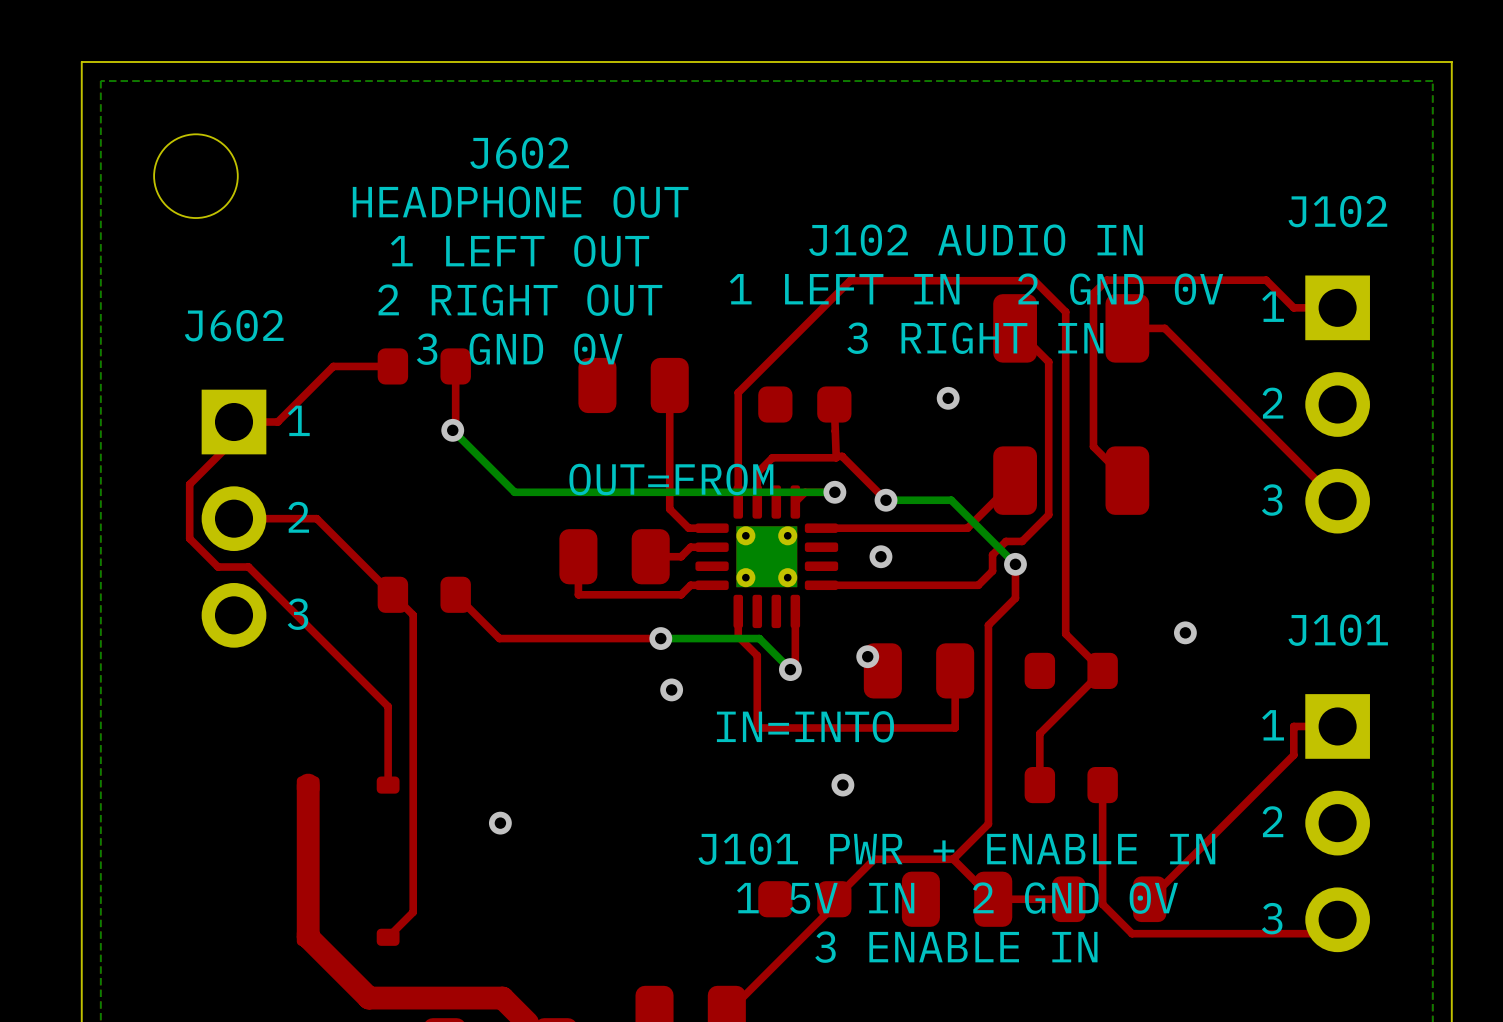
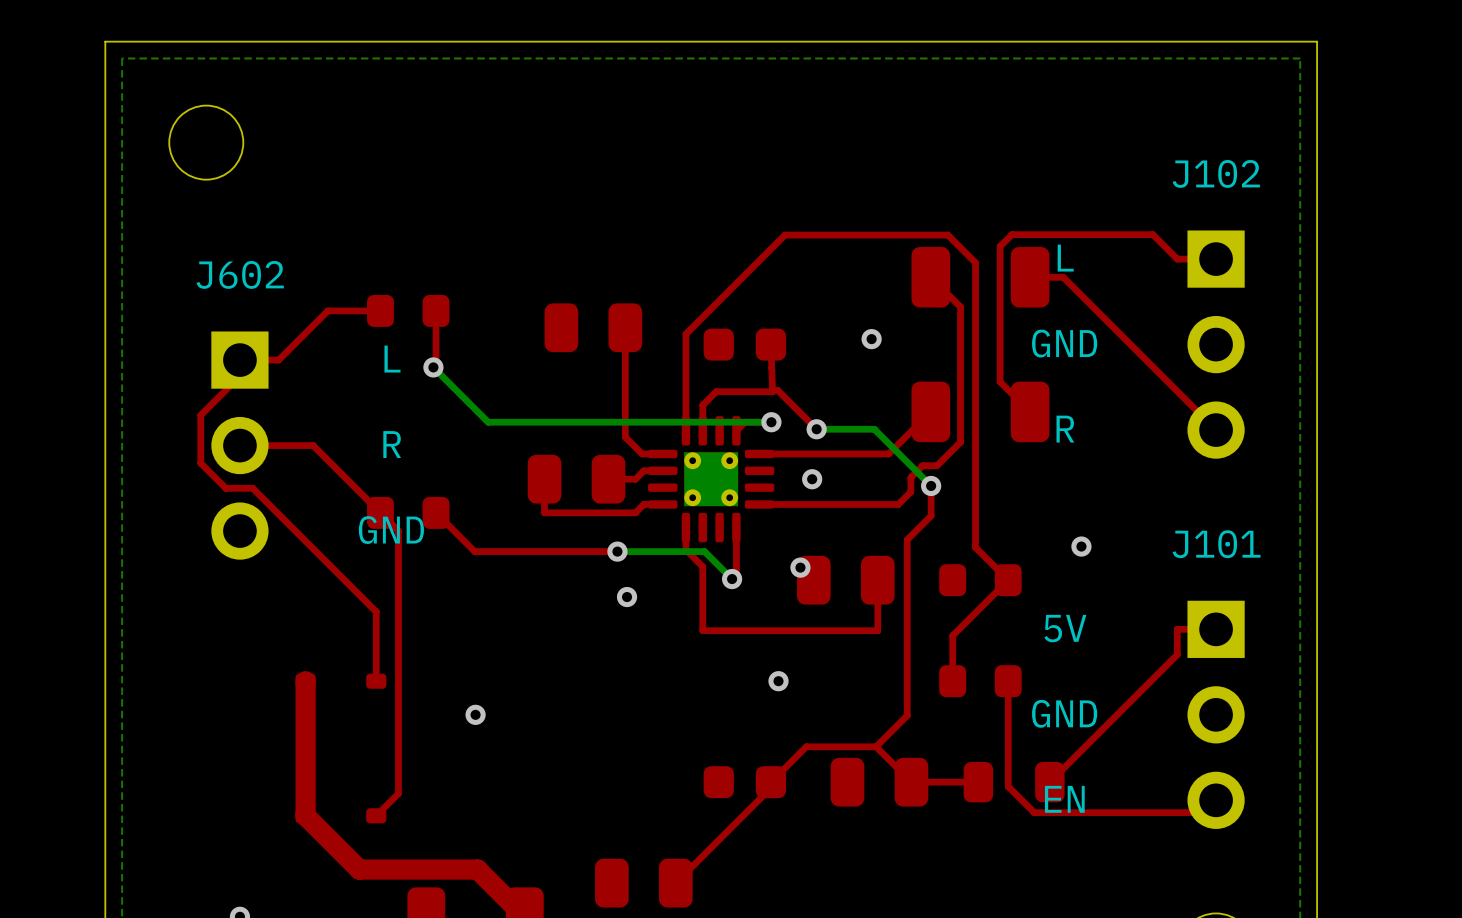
text: J602 (519, 153) -> none
text: HEADPHONE OUT (520, 202) -> none
text: J102 AUDIO IN (975, 240) -> none
text: 1 LEFT OUT (520, 251) -> none
text: 1 LEFT IN 2 GND 0V (976, 289) -> none
text: 2 RIGHT OUT (520, 300) -> none
text: none -> L (1065, 258)
text: 1 (1273, 306) -> none
text: 3 RIGHT IN (975, 338) -> none
text: 3 GND 0V (519, 349) -> none
text: none -> GND (1064, 343)
text: 2 (1272, 403) -> none
text: 1 (298, 420) -> none
text: none -> L (392, 359)
text: OUT=FROM (671, 479) -> none
text: none -> R (1065, 429)
text: 3 (1272, 500) -> none
text: 2 (298, 517) -> none
text: none -> R (392, 444)
text: 3 (297, 614) -> none
text: none -> GND (391, 530)
text: none -> 5V (1065, 628)
text: 1 (1273, 725) -> none
text: IN=INTO (805, 726) -> none
text: none -> GND (1064, 713)
text: 2 (1272, 821) -> none
text: J101 PWR + ENABLE IN (956, 849) -> none
text: 1 5V IN 2 GND 0V (957, 898) -> none
text: none -> EN (1064, 799)
text: 3 (1272, 918) -> none
text: 3 ENABLE IN (956, 947) -> none

